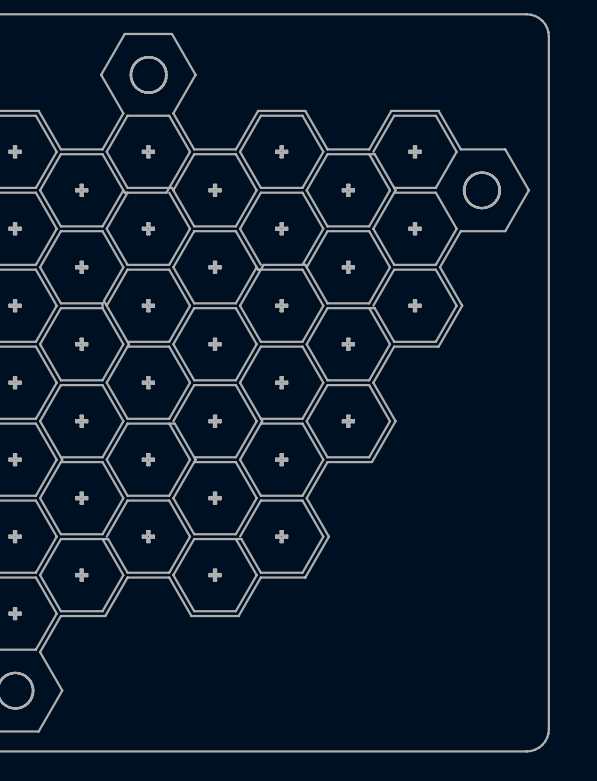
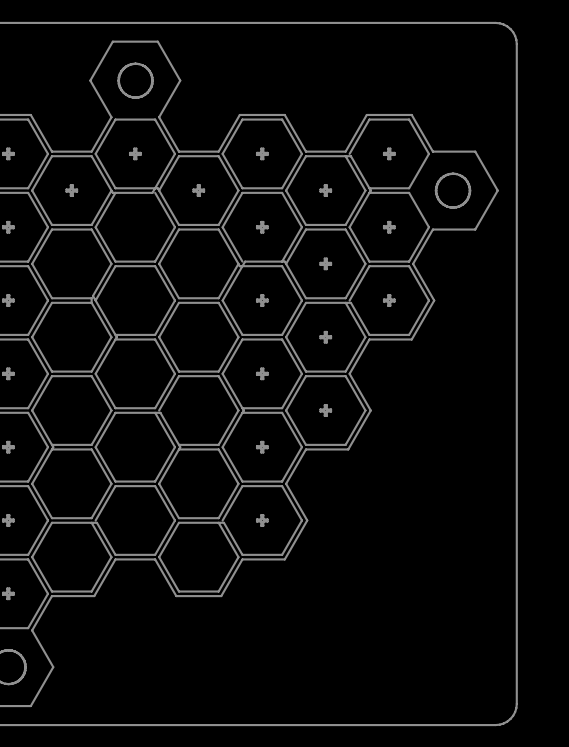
line: (147, 223) (147, 227) (142, 227) (142, 229) (147, 229) (147, 234) (149, 234) (149, 229) (153, 229) (153, 227) (149, 227) (149, 223) (147, 223) -> none
line: (80, 261) (80, 266) (76, 266) (76, 268) (80, 268) (80, 272) (82, 272) (82, 268) (87, 268) (87, 266) (82, 266) (82, 261) (80, 261) -> none
line: (213, 261) (213, 266) (209, 266) (209, 268) (213, 268) (213, 272) (216, 272) (216, 268) (220, 268) (220, 266) (216, 266) (216, 261) (213, 261) -> none
line: (147, 300) (147, 304) (142, 304) (142, 306) (147, 306) (147, 311) (149, 311) (149, 306) (153, 306) (153, 304) (149, 304) (149, 300) (147, 300) -> none
line: (80, 338) (80, 343) (76, 343) (76, 345) (80, 345) (80, 349) (82, 349) (82, 345) (87, 345) (87, 343) (82, 343) (82, 338) (80, 338) -> none
line: (213, 338) (213, 343) (209, 343) (209, 345) (213, 345) (213, 349) (216, 349) (216, 345) (220, 345) (220, 343) (216, 343) (216, 338) (213, 338) -> none
line: (147, 377) (147, 381) (142, 381) (142, 383) (147, 383) (147, 388) (149, 388) (149, 383) (153, 383) (153, 381) (149, 381) (149, 377) (147, 377) -> none
line: (80, 415) (80, 420) (76, 420) (76, 422) (80, 422) (80, 426) (82, 426) (82, 422) (87, 422) (87, 420) (82, 420) (82, 415) (80, 415) -> none
line: (213, 415) (213, 420) (209, 420) (209, 422) (213, 422) (213, 426) (216, 426) (216, 422) (220, 422) (220, 420) (216, 420) (216, 415) (213, 415) -> none
line: (147, 454) (147, 458) (142, 458) (142, 460) (147, 460) (147, 465) (149, 465) (149, 460) (153, 460) (153, 458) (149, 458) (149, 454) (147, 454) -> none
line: (80, 492) (80, 497) (76, 497) (76, 499) (80, 499) (80, 503) (82, 503) (82, 499) (87, 499) (87, 497) (82, 497) (82, 492) (80, 492) -> none
line: (213, 492) (213, 497) (209, 497) (209, 499) (213, 499) (213, 503) (216, 503) (216, 499) (220, 499) (220, 497) (216, 497) (216, 492) (213, 492) -> none
line: (147, 531) (147, 535) (142, 535) (142, 537) (147, 537) (147, 542) (149, 542) (149, 537) (153, 537) (153, 535) (149, 535) (149, 531) (147, 531) -> none
line: (80, 569) (80, 574) (76, 574) (76, 576) (80, 576) (80, 580) (82, 580) (82, 576) (87, 576) (87, 574) (82, 574) (82, 569) (80, 569) -> none
line: (213, 569) (213, 574) (209, 574) (209, 576) (213, 576) (213, 580) (216, 580) (216, 576) (220, 576) (220, 574) (216, 574) (216, 569) (213, 569) -> none

